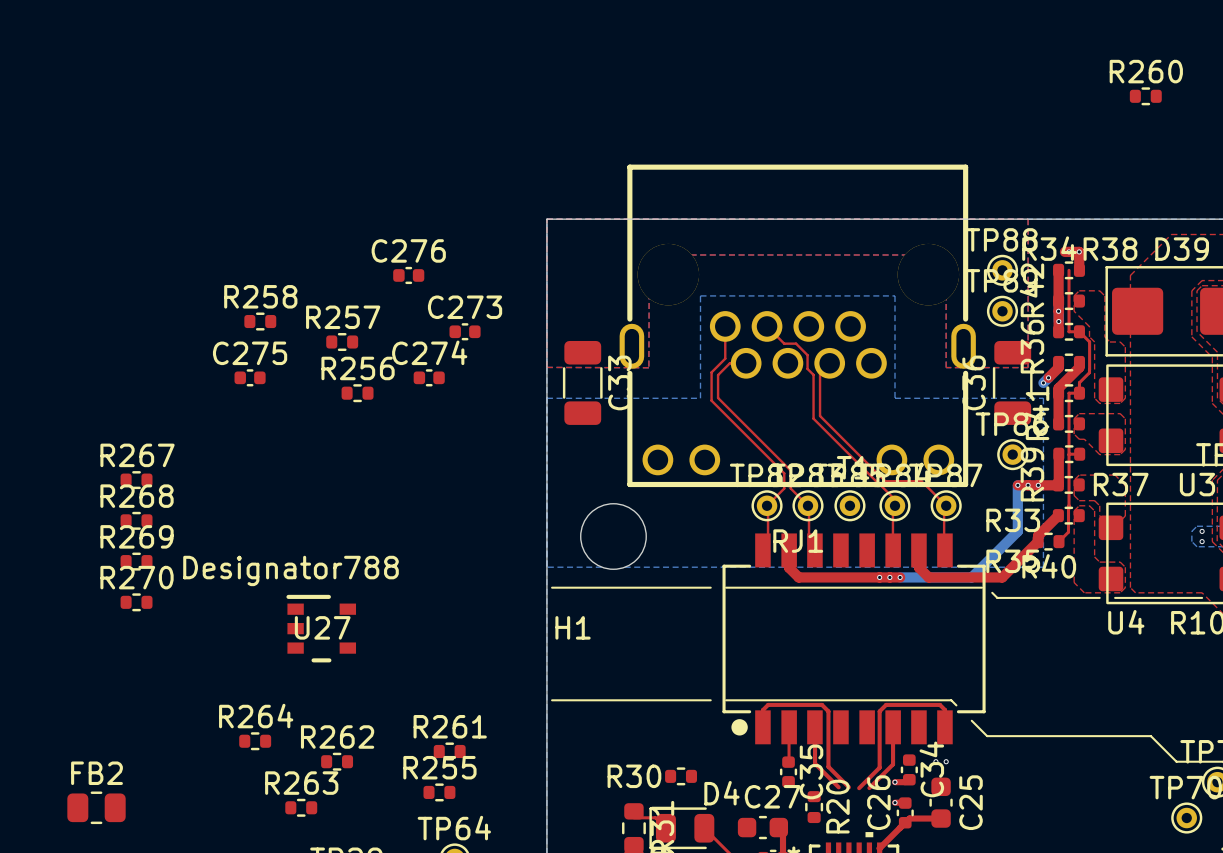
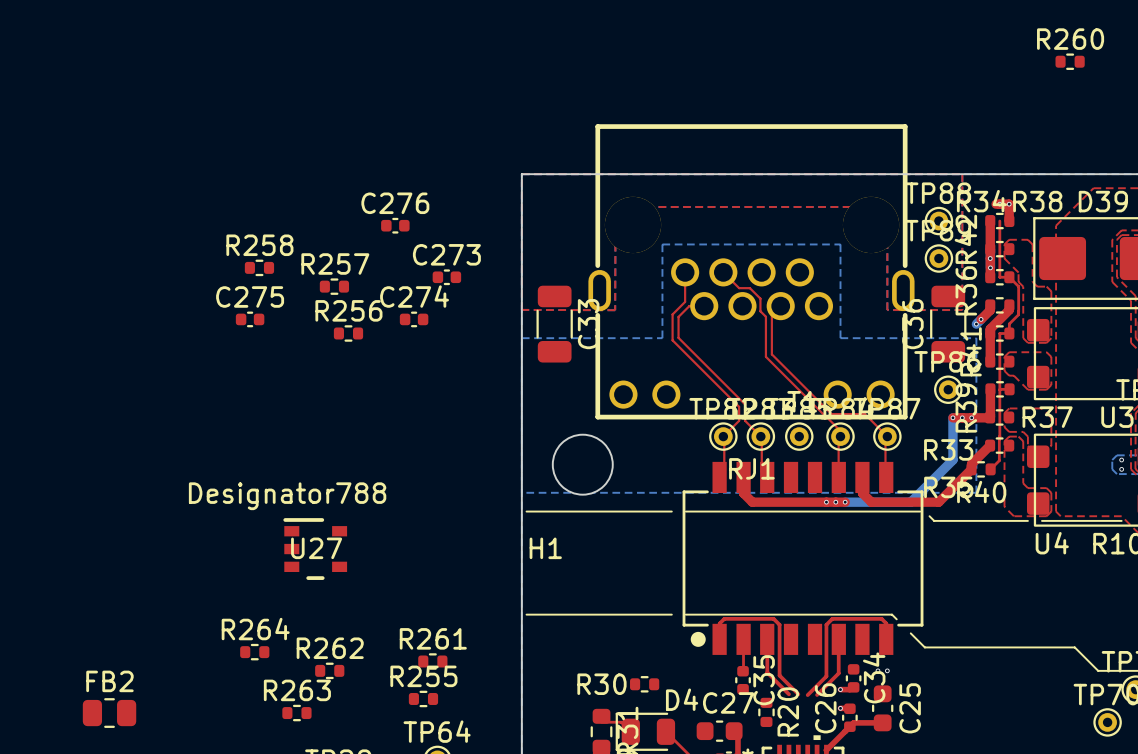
R267: (136, 480) -> none
R268: (136, 520) -> none
R269: (136, 561) -> none
R270: (136, 602) -> none

